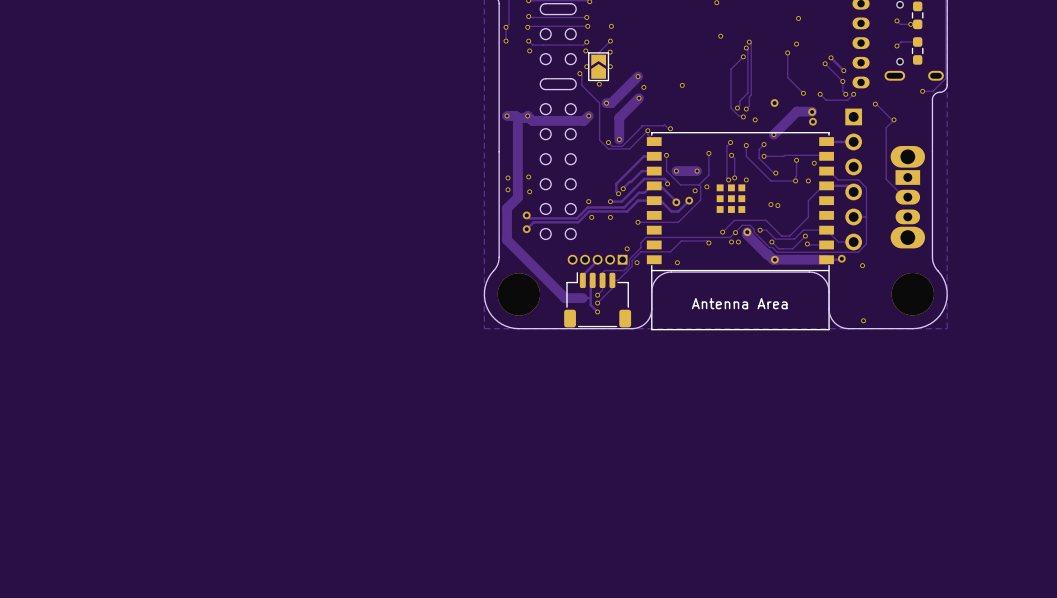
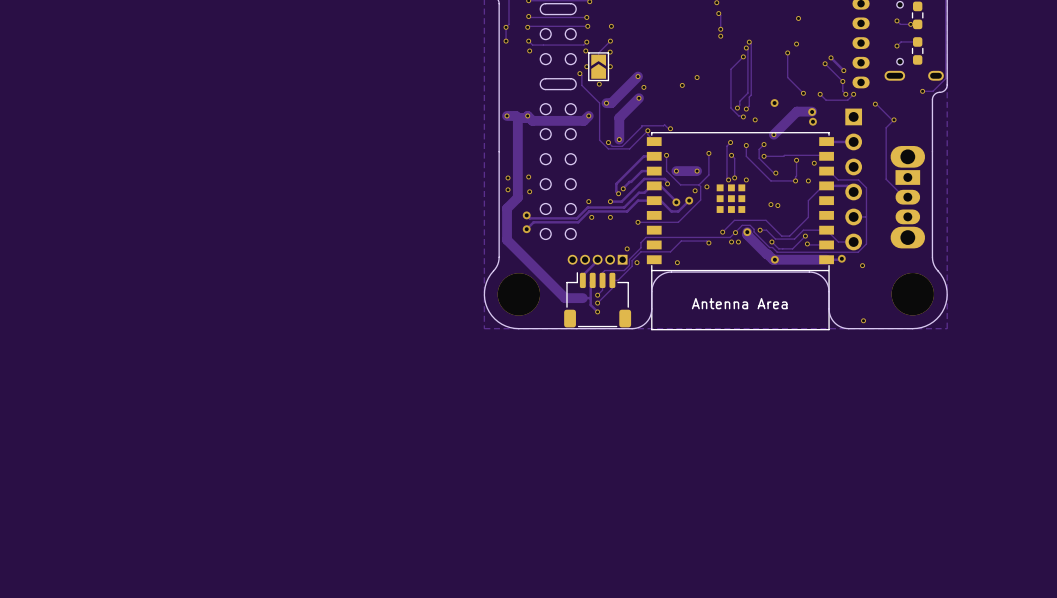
track: none -> (718, 13) (720, 15) (720, 29)
via: none -> (718, 13)
via: none -> (720, 29)
via: none -> (697, 77)

